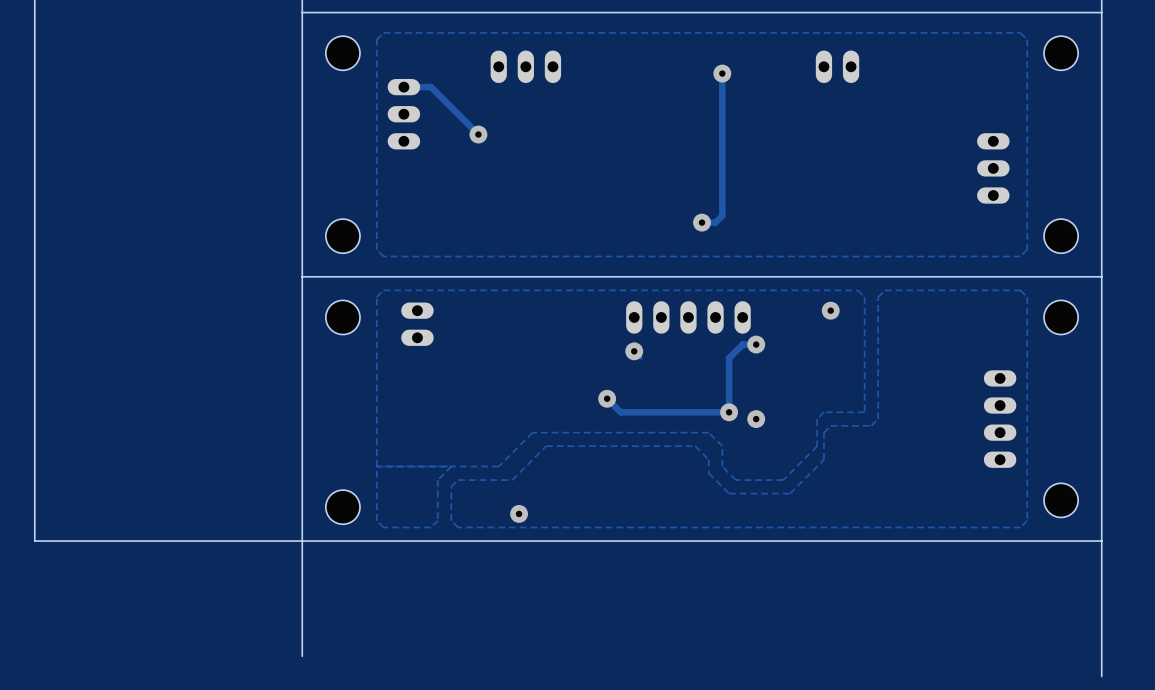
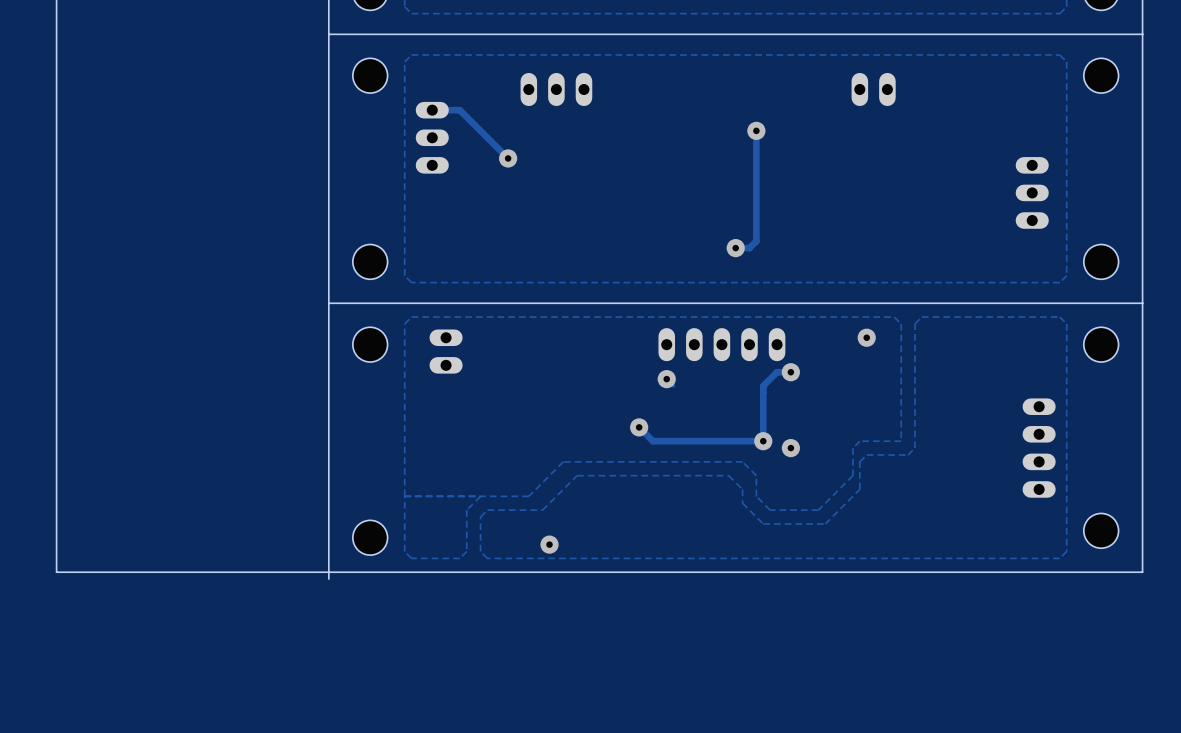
track: (722, 73) (722, 107) -> none
via position: (722, 73) -> (756, 130)
board edge: (1101, 541) (1101, 676) -> none
board edge: (302, 547) (302, 656) -> none

